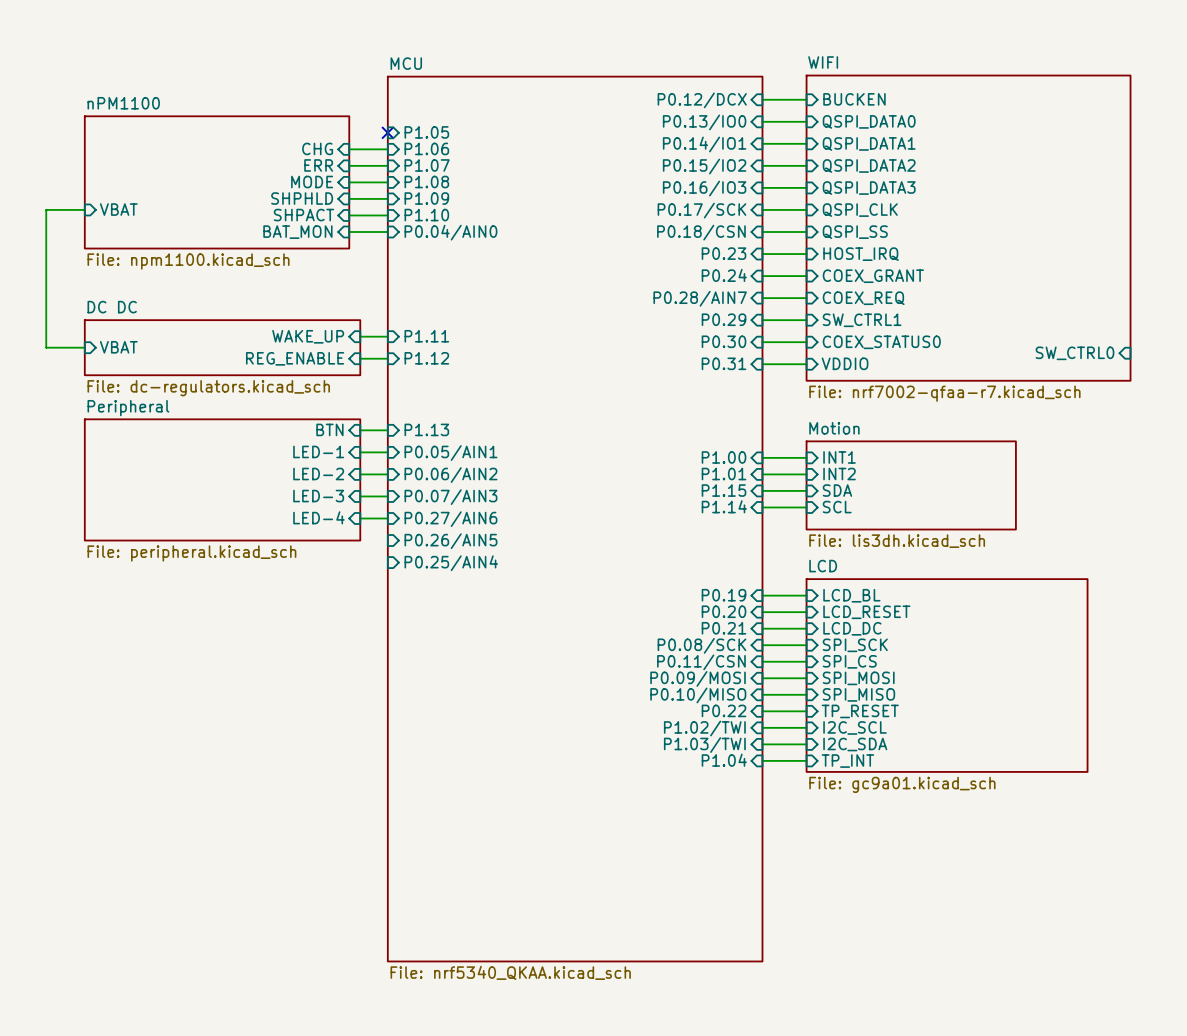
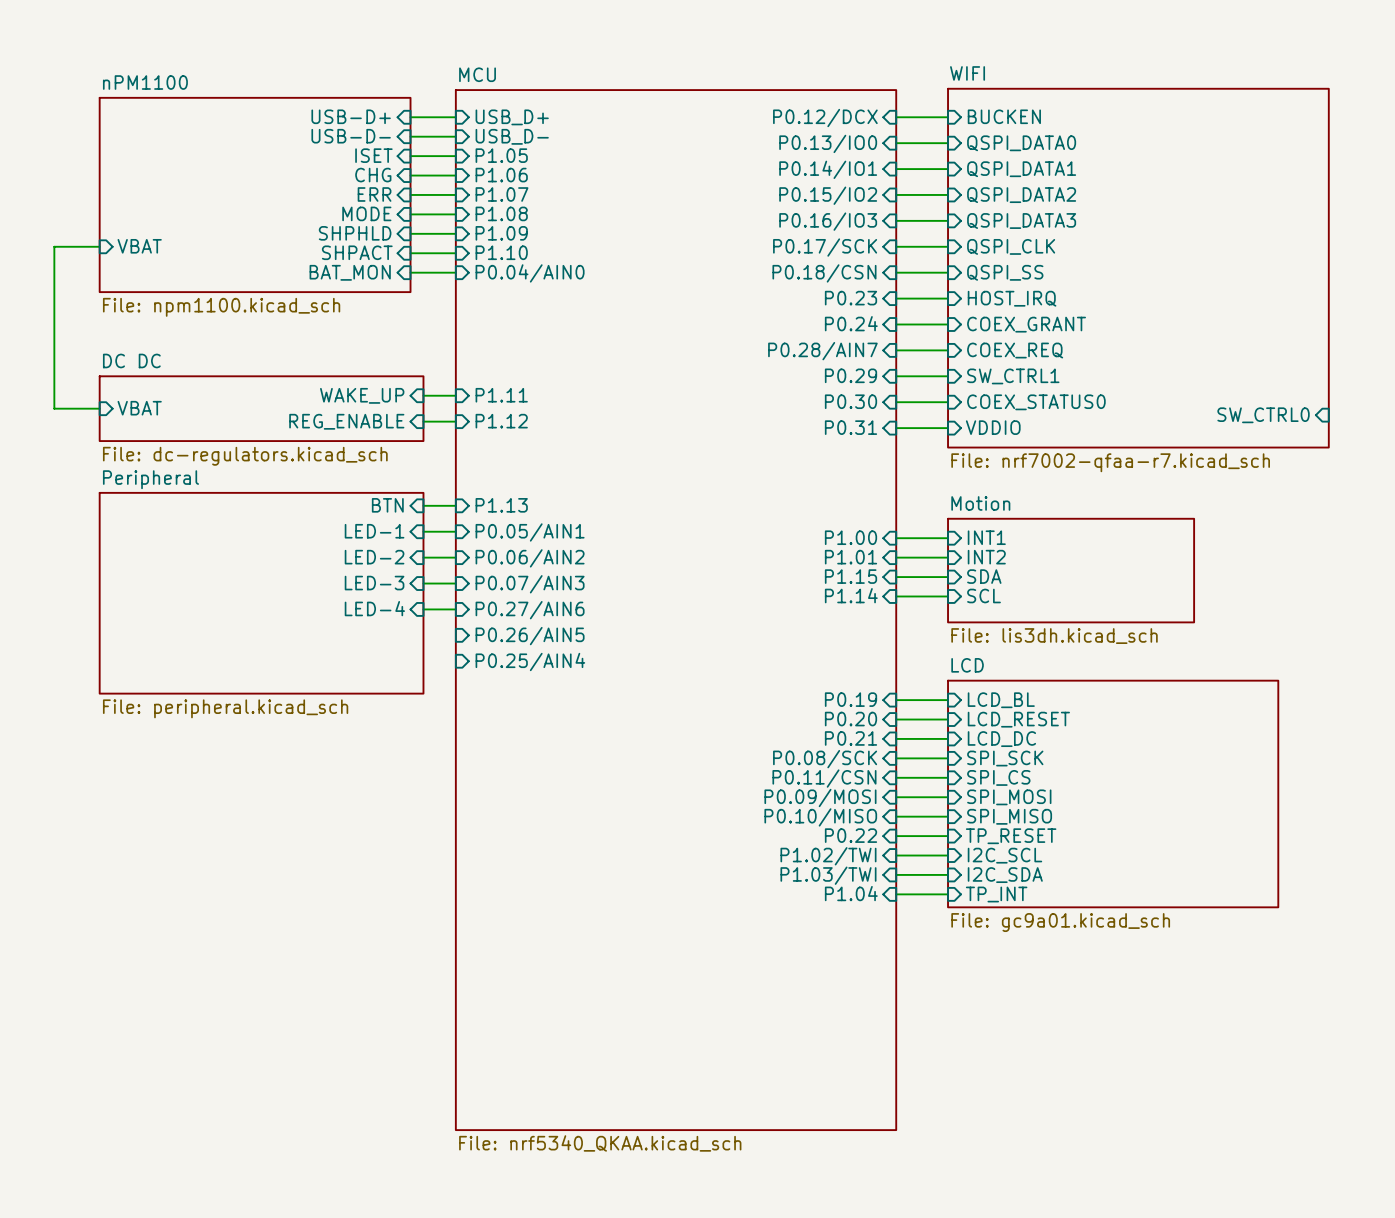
sheet pin: none -> USB-D+ (351, 116)
wire: none -> (410, 117) (455, 117)
sheet pin: none -> USB_D+ (512, 117)
sheet nPM1100 shape: [84, 115, 350, 250] -> [98, 97, 412, 293]
sheet pin: none -> USB-D- (351, 136)
wire: none -> (410, 136) (455, 136)
sheet pin: none -> USB_D- (512, 136)
sheet pin: none -> ISET (373, 155)
wire: none -> (410, 156) (455, 156)
no-connect mark: (387, 132) -> none
sheet Peripheral: File: peripheral.kicad_sch (222, 479) -> none
sheet Peripheral: none -> File: peripheral.kicad_sch (261, 593)

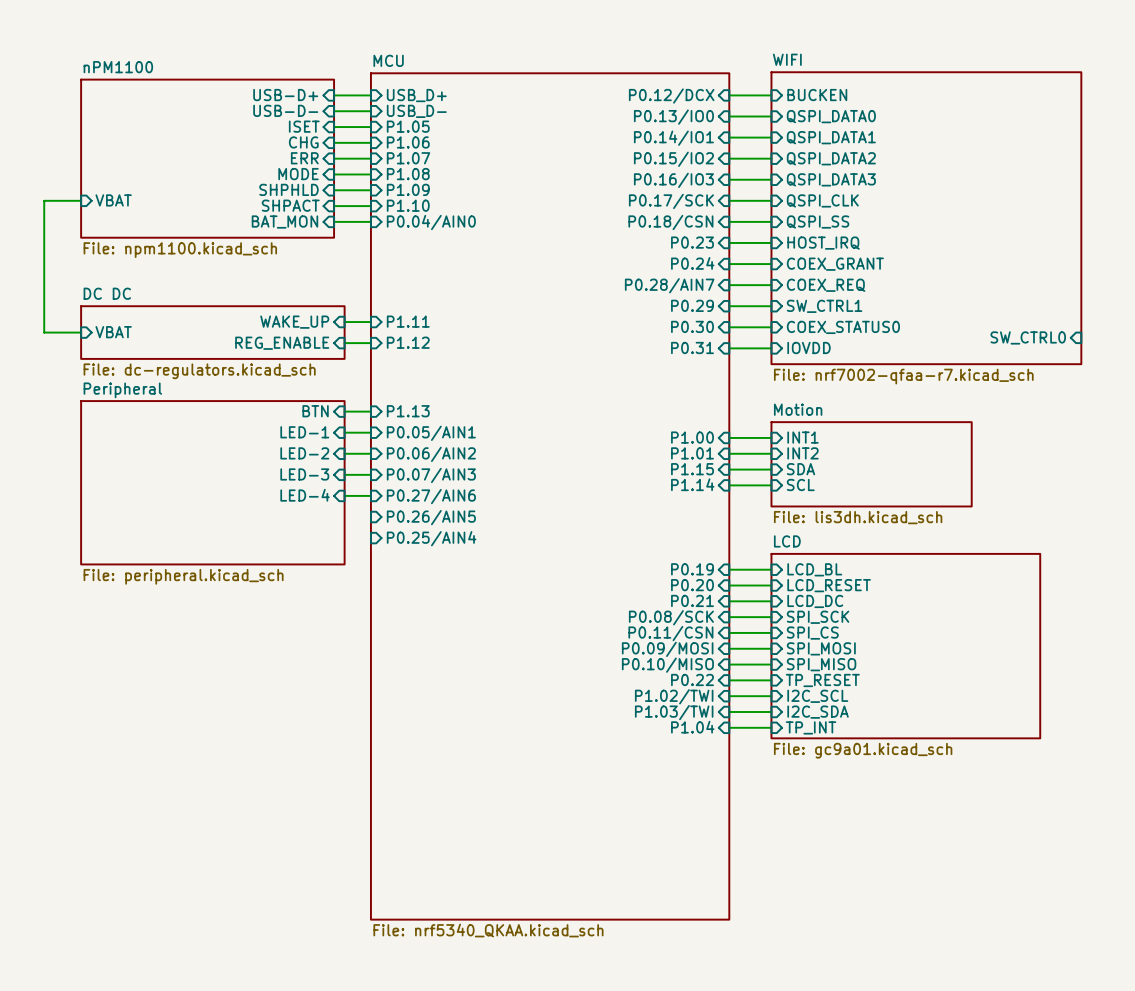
sheet pin: VDDIO (993, 427) -> IOVDD (809, 347)

